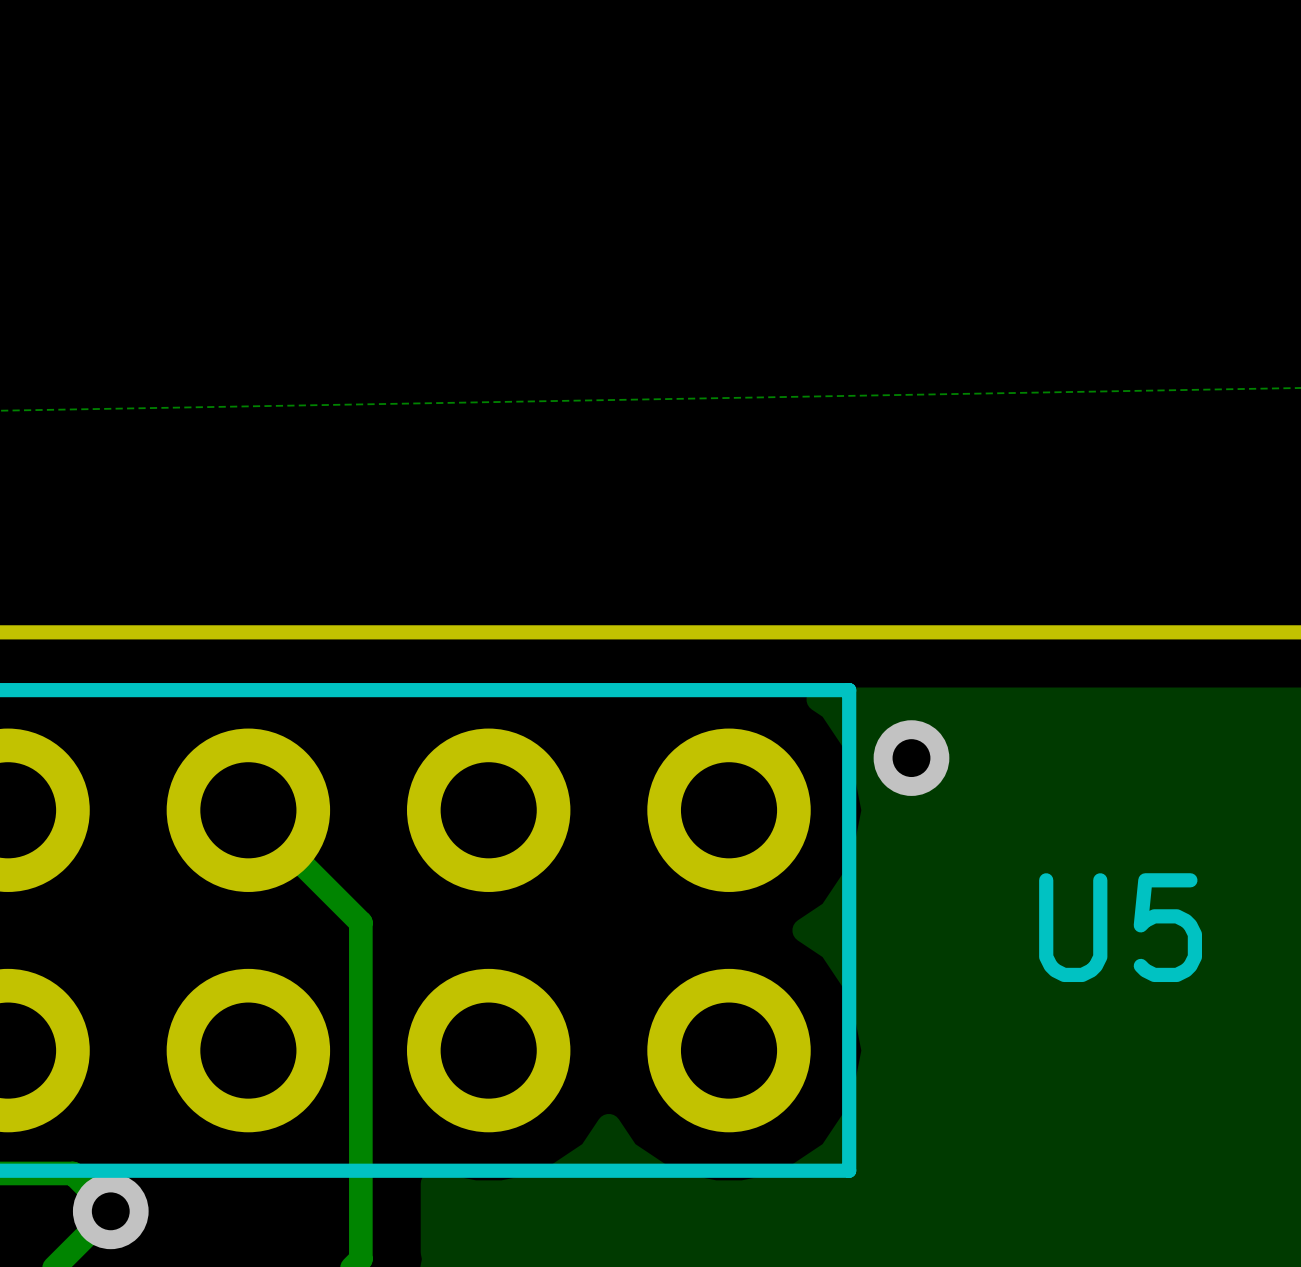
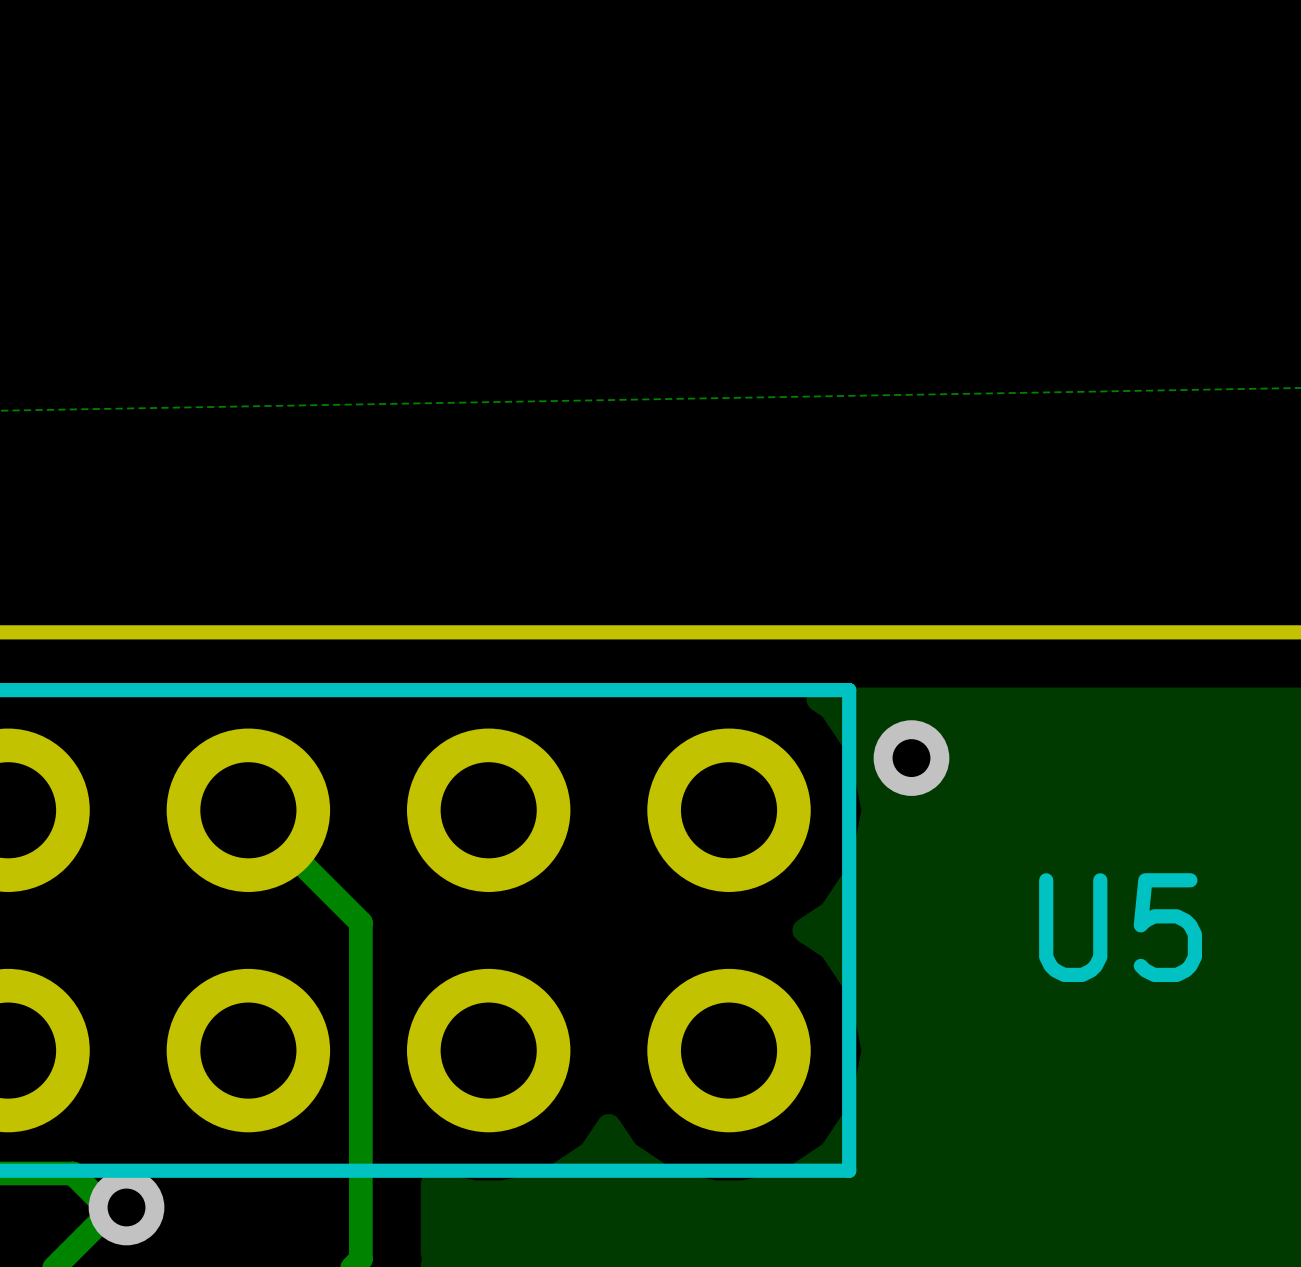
via position: (110, 1211) -> (126, 1207)

